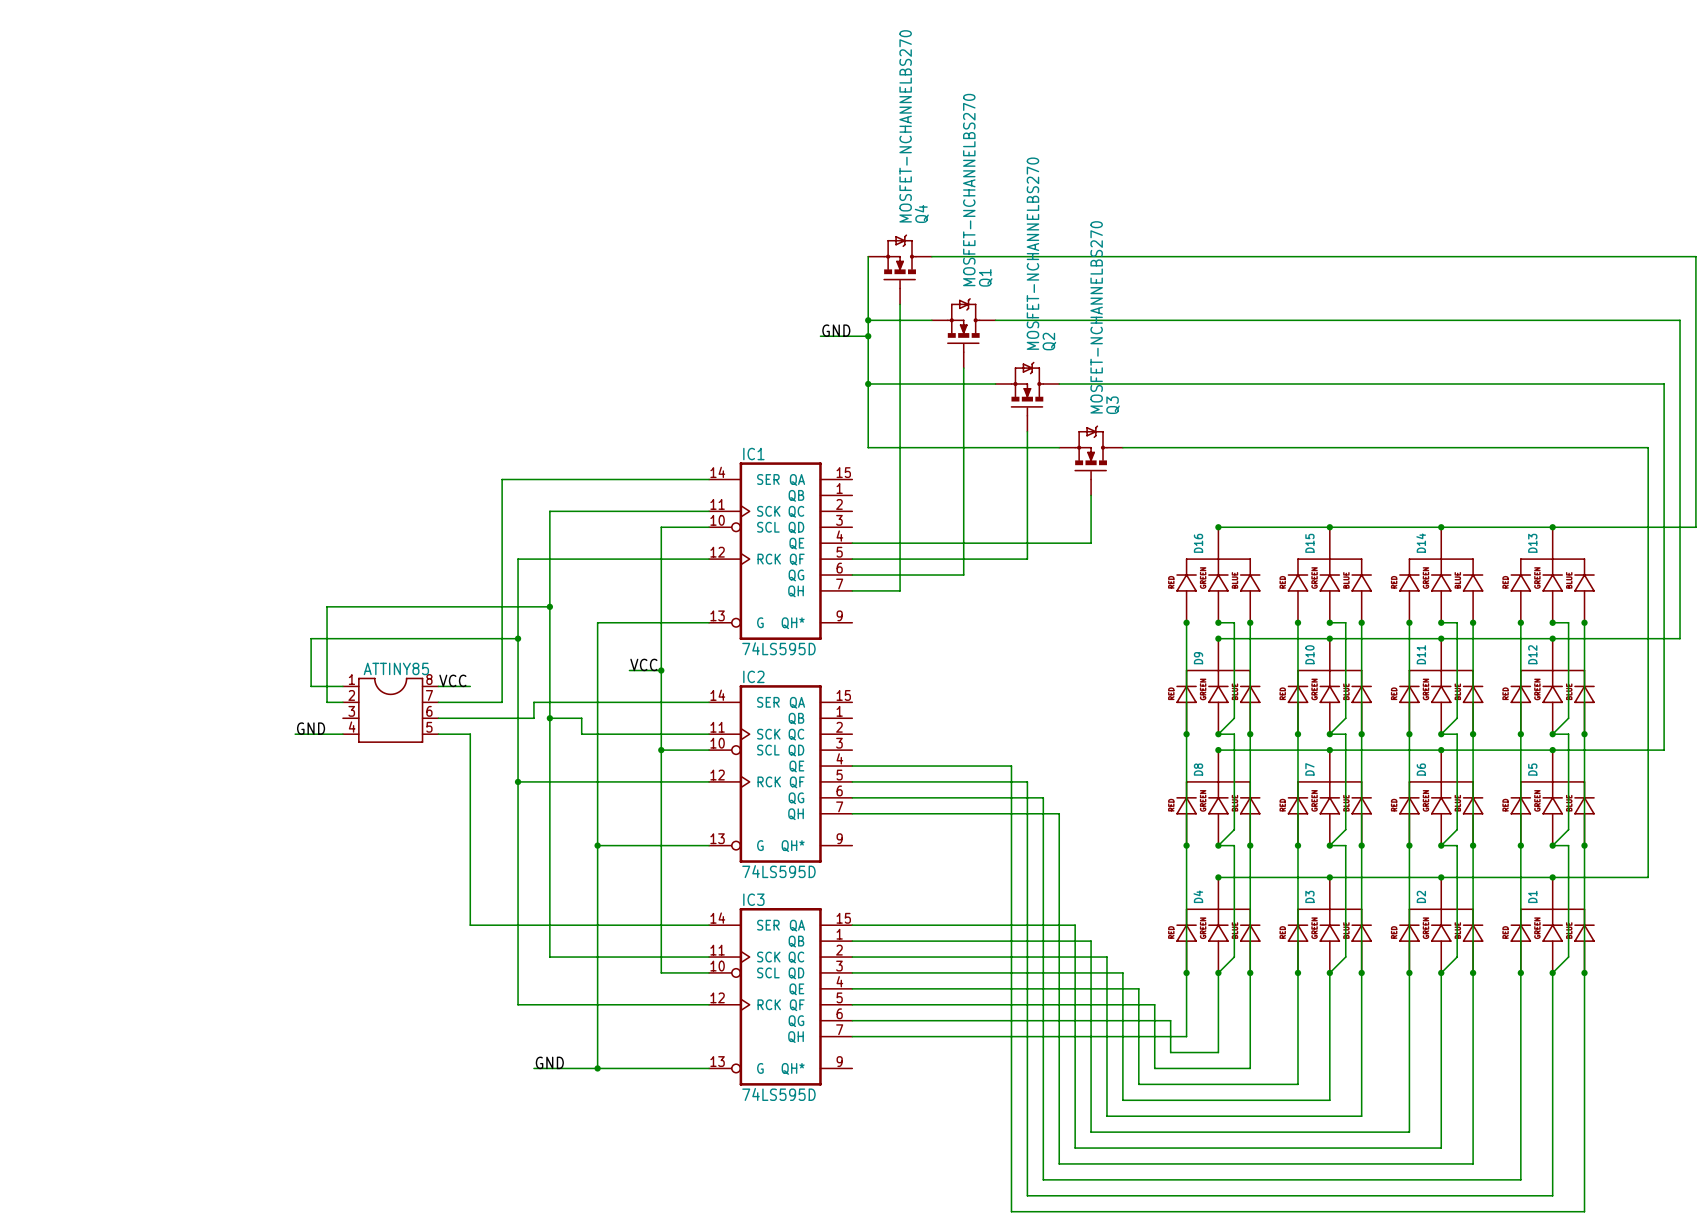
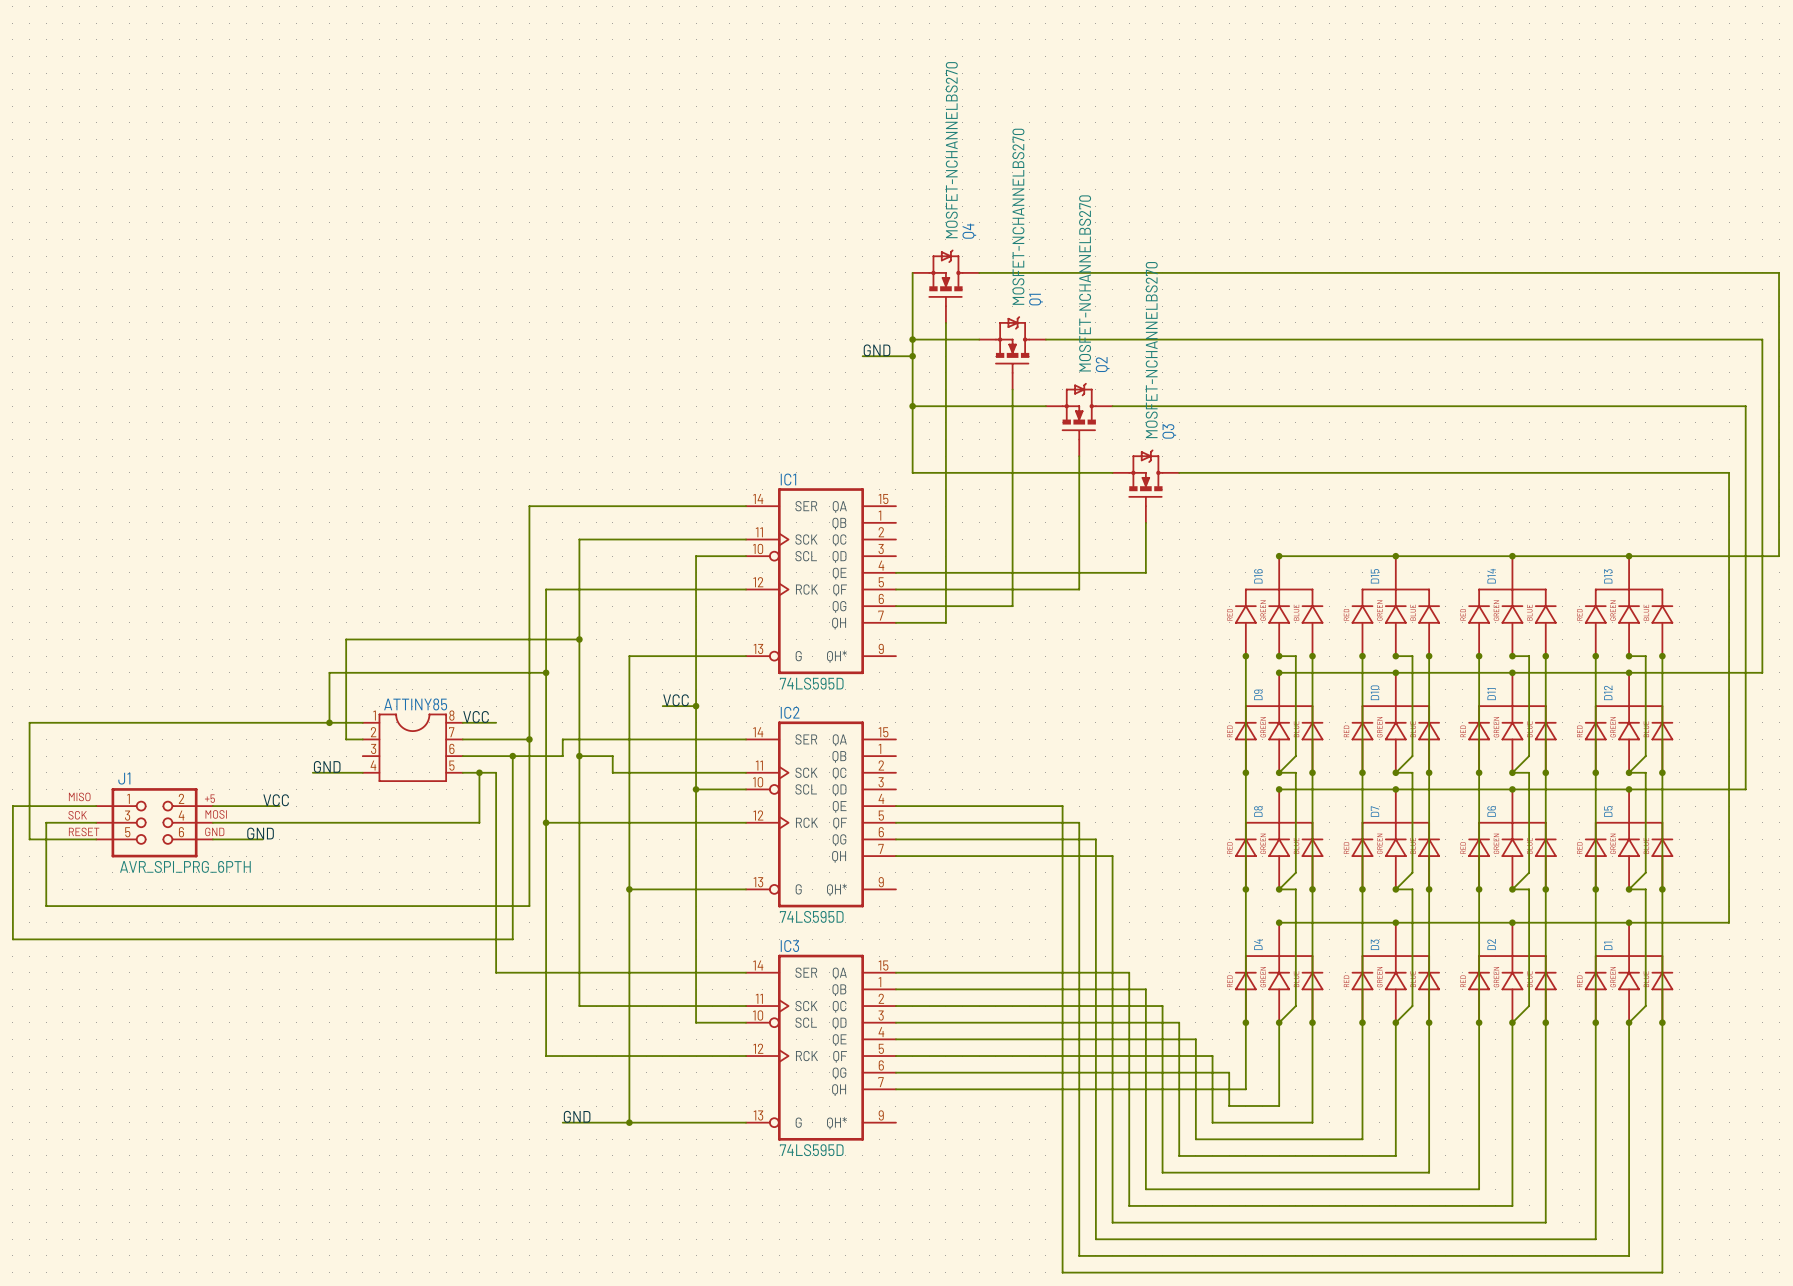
wire: none -> (329, 722) (29, 722) (29, 839) (96, 839)
junction: none -> (329, 722)
wire: none -> (529, 739) (529, 906) (46, 906) (46, 822) (96, 822)
junction: none -> (529, 739)
wire: none -> (512, 756) (512, 939) (12, 939) (12, 806) (96, 806)
junction: none -> (512, 756)
wire: none -> (479, 772) (479, 822) (212, 822)
junction: none -> (479, 772)
label: none -> VCC (276, 800)
wire: none -> (212, 806) (279, 806)
J1: none -> AVR_SPI_PRG_6PTH (154, 822)
label: none -> GND (260, 833)
wire: none -> (212, 839) (262, 839)

